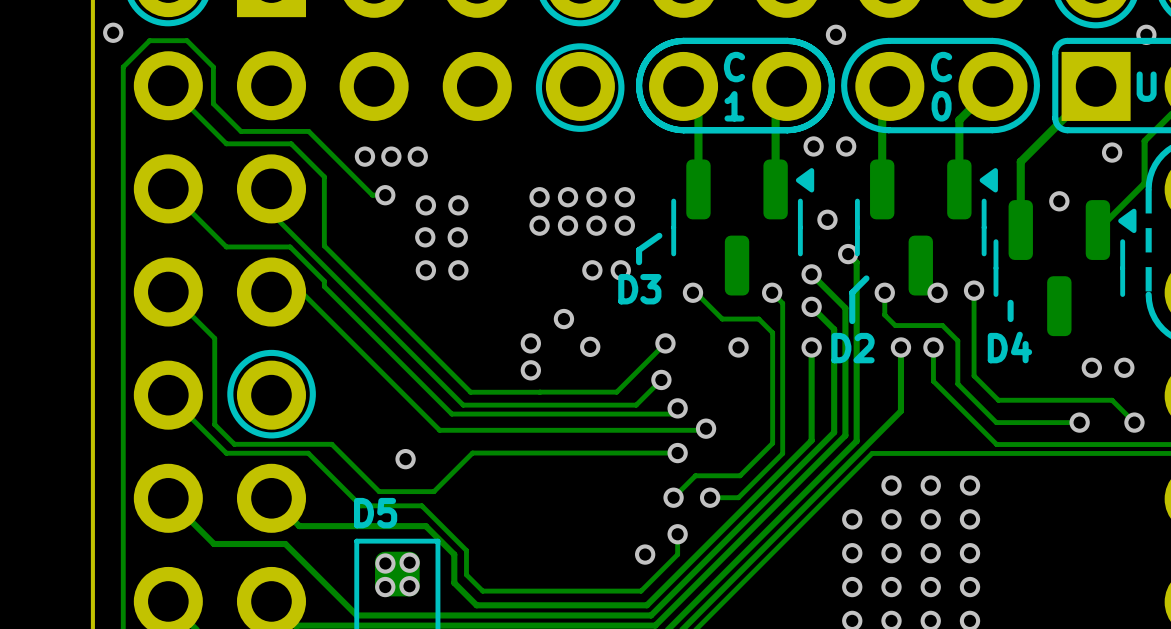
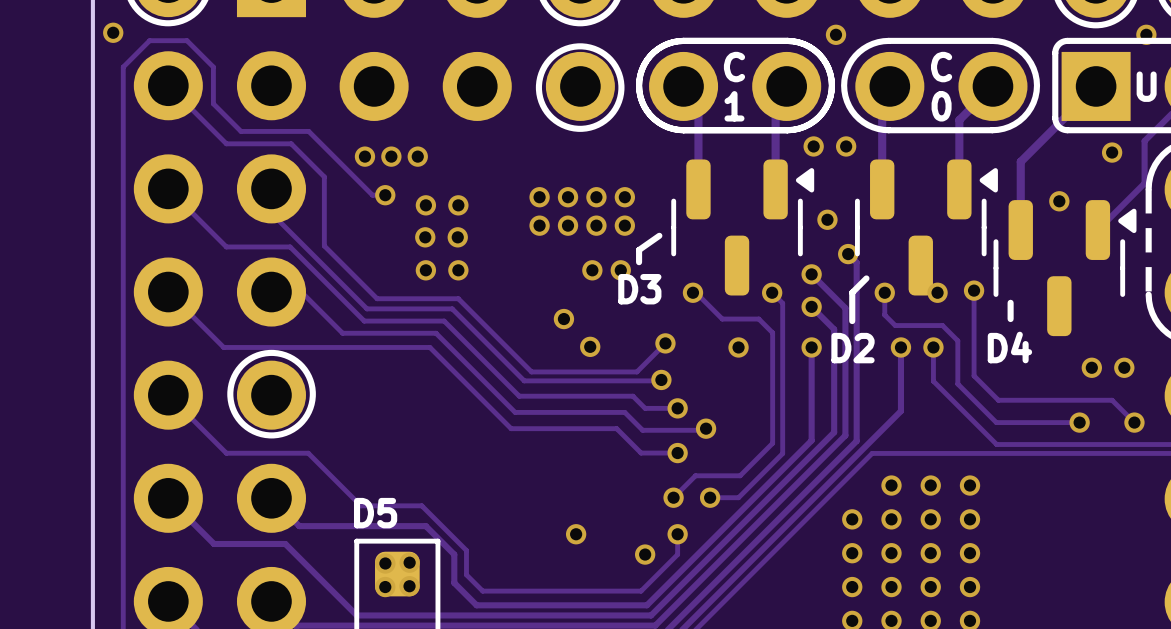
track: (324, 281) (324, 286) (451, 414) (671, 414) (677, 408) -> (324, 281) (364, 321) (444, 321) (519, 396) (632, 396) (645, 408) (677, 408)
track: (377, 298) (470, 392) (616, 392) (636, 371) -> (377, 298) (458, 298) (531, 371) (636, 371)
track: (367, 308) (463, 405) (636, 405) (660, 380) -> (367, 308) (452, 308) (524, 380) (660, 380)
track: (342, 333) (439, 430) (642, 430) -> (342, 333) (436, 333) (515, 412) (624, 412) (642, 430)
track: (214, 338) (214, 424) (234, 444) (331, 444) (379, 491) (434, 491) (472, 453) (641, 453) -> (214, 338) (223, 347) (429, 347) (511, 428) (616, 428) (641, 453)
via: (530, 343) -> none
via: (530, 370) -> none
via: (405, 459) -> none
via: none -> (576, 534)

